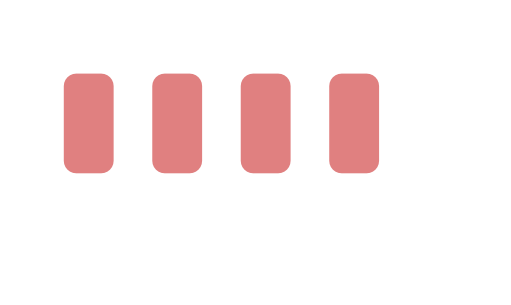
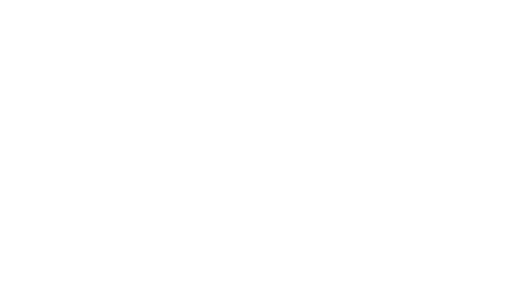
part: (88, 123) -> none
part: (177, 123) -> none
part: (265, 123) -> none
part: (354, 123) -> none

